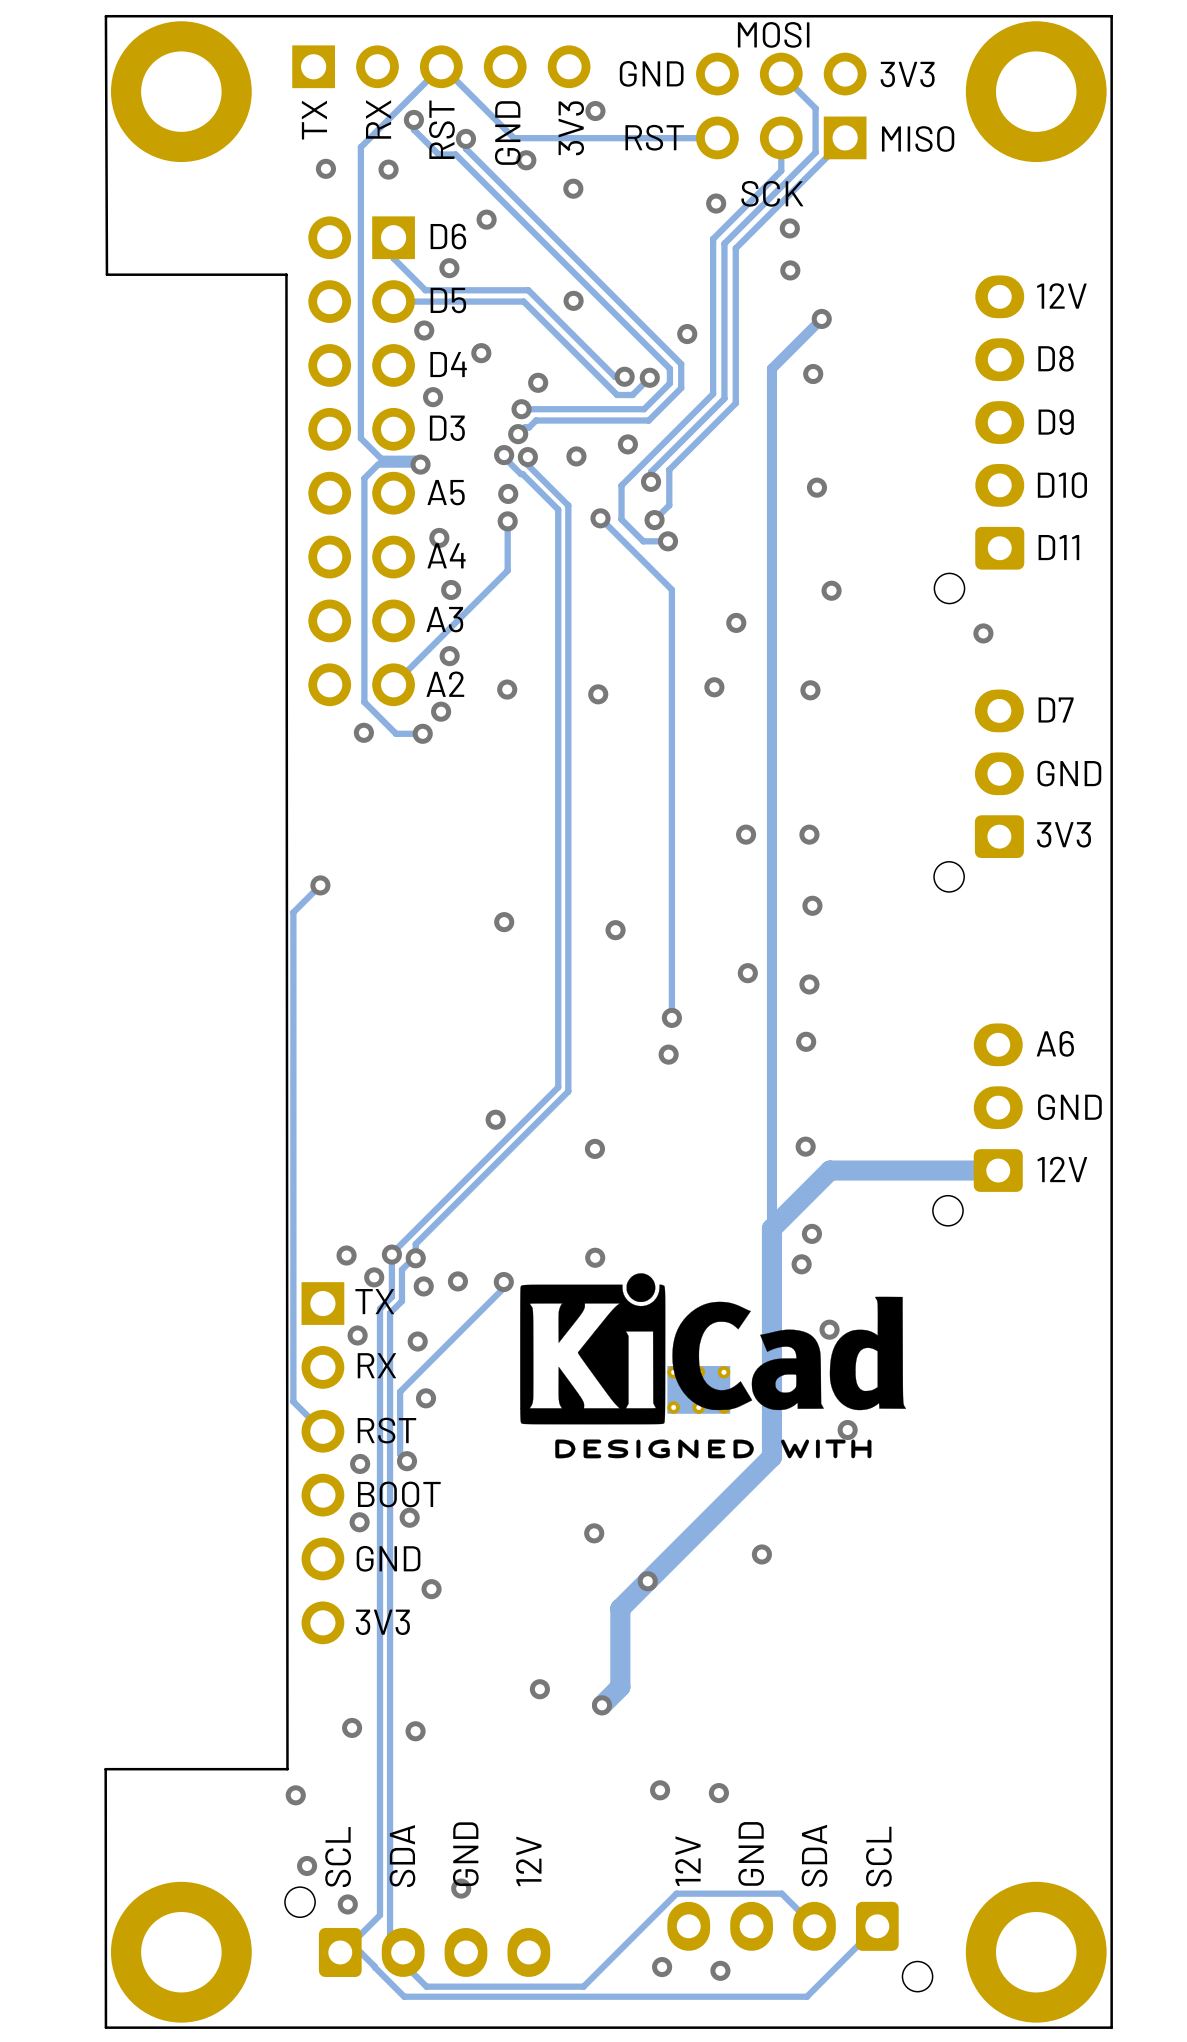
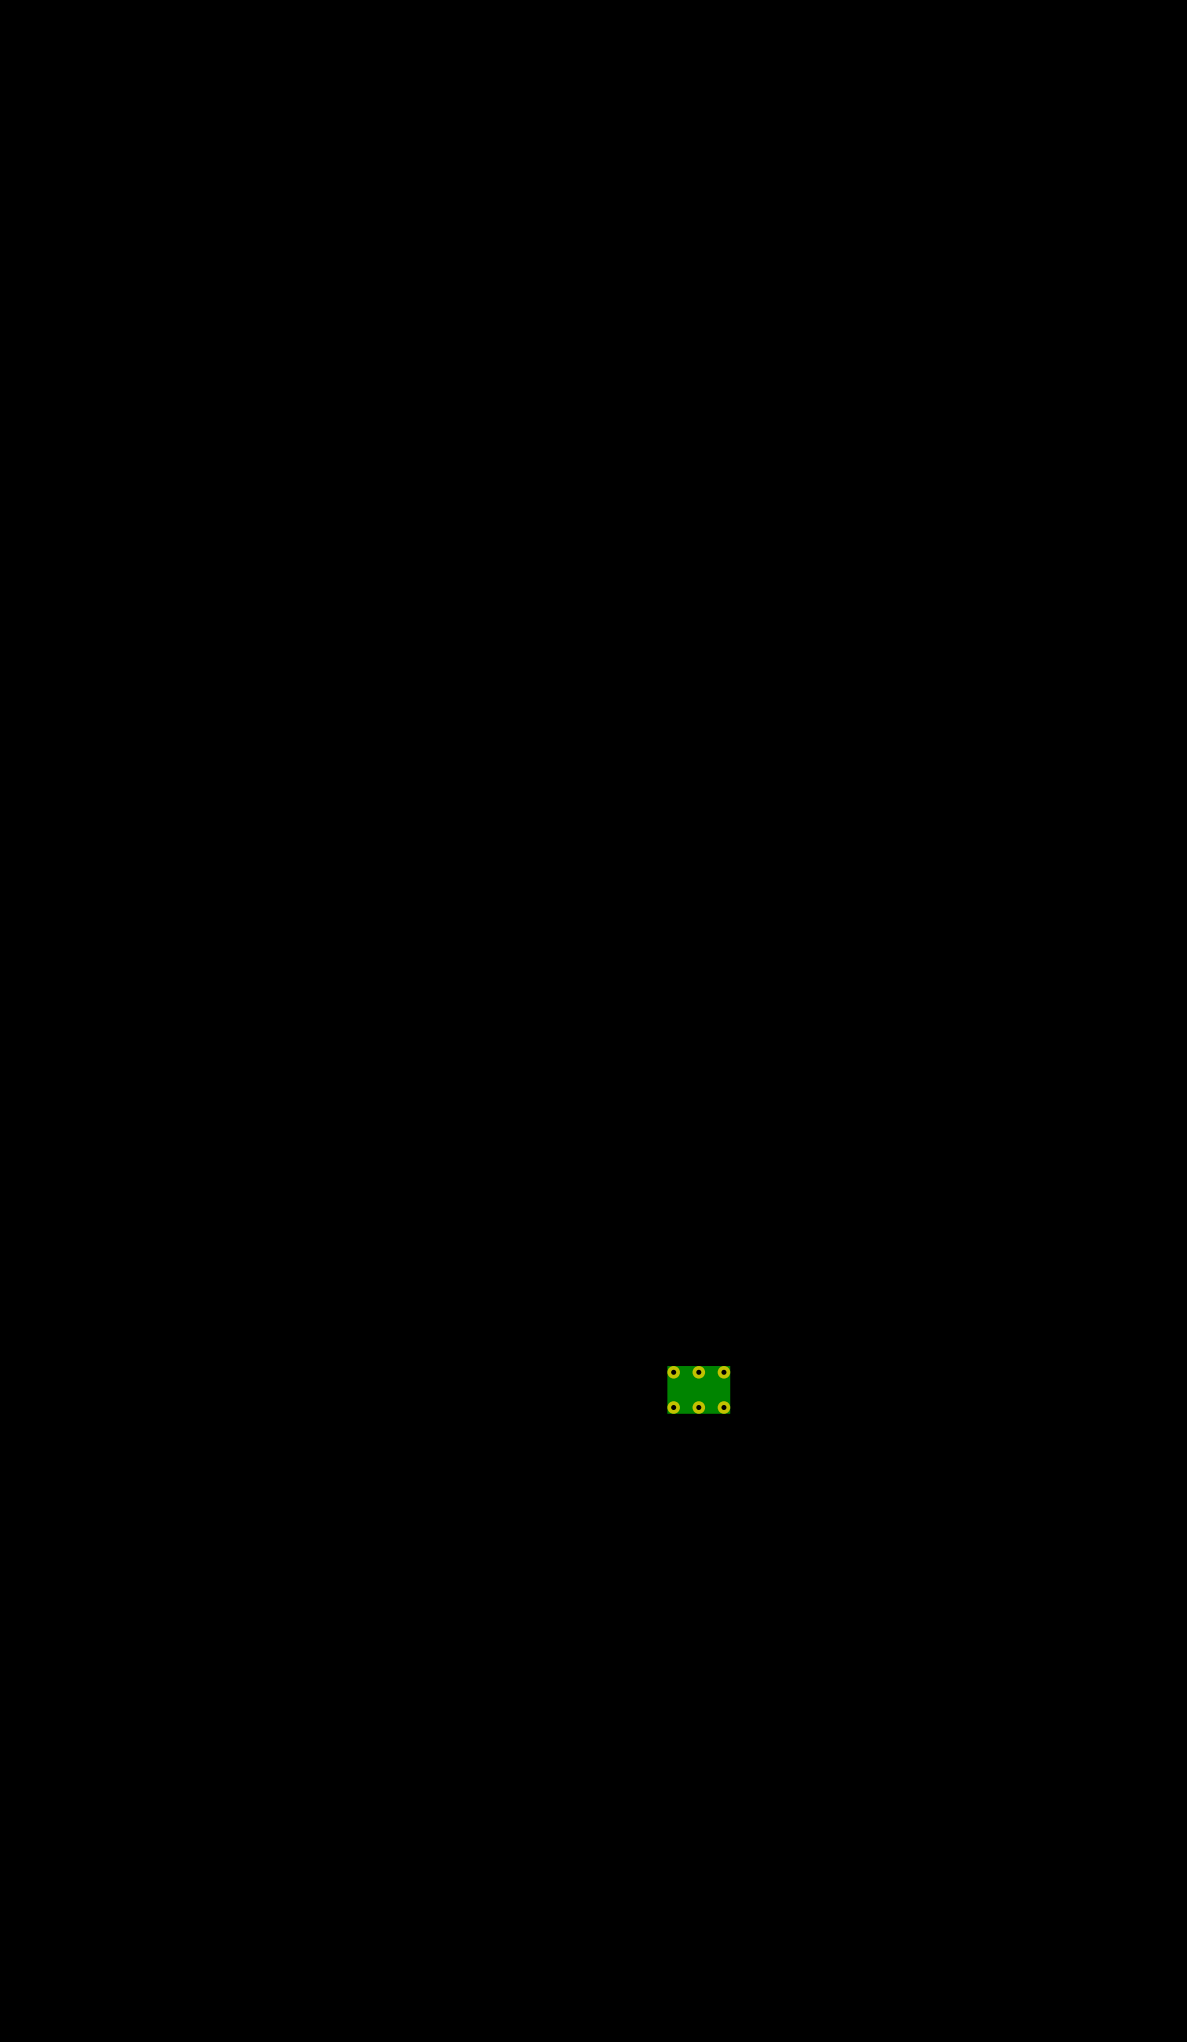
board edge: (1111, 16) (105, 16) (106, 274) (286, 274) (287, 1769) (105, 1769) (105, 2027) (1111, 2027) (1111, 16) -> none
text: MOSI (773, 34) -> none
part: (441, 66) -> none
text: GND (651, 73) -> none
track: (781, 74) (815, 108) (815, 152) (724, 243) (724, 398) (651, 472) (651, 481) -> none
text: 3V3 (907, 74) -> none
part: (181, 91) -> none
part: (1036, 91) -> none
part: (781, 105) -> none
via: (595, 111) -> none
text: RX (378, 119) -> none
track: (413, 119) (413, 129) (438, 154) (455, 154) (669, 368) (669, 383) (644, 409) (521, 409) -> none
via: (413, 119) -> none
text: TX (314, 120) -> none
text: 3V3 (571, 128) -> none
text: RST (441, 129) -> none
text: GND (507, 133) -> none
text: RST (654, 137) -> none
track: (781, 137) (781, 170) (713, 238) (713, 393) (621, 485) (621, 519) (643, 541) (668, 541) -> none
track: (845, 137) (735, 248) (735, 403) (669, 469) (669, 505) (654, 520) -> none
track: (465, 138) (465, 148) (681, 364) (681, 388) (648, 420) (536, 420) (518, 434) -> none
via: (465, 138) -> none
track: (717, 138) (514, 138) (441, 66) (360, 147) (360, 438) (381, 458) (414, 458) (420, 464) (378, 464) (364, 478) (364, 702) (396, 733) (422, 733) -> none
text: MISO (918, 138) -> none
via: (526, 160) -> none
via: (325, 168) -> none
via: (388, 169) -> none
via: (573, 188) -> none
text: SCK (772, 193) -> none
via: (716, 203) -> none
via: (486, 219) -> none
via: (789, 228) -> none
text: D6 (448, 236) -> none
track: (393, 237) (393, 258) (425, 290) (528, 290) (614, 376) (624, 376) -> none
via: (449, 268) -> none
via: (790, 270) -> none
text: 12V (1061, 295) -> none
text: D5 (448, 300) -> none
via: (573, 300) -> none
track: (393, 301) (523, 301) (617, 394) (632, 394) (649, 377) -> none
track: (821, 318) (771, 368) (771, 1228) -> none
via: (821, 318) -> none
via: (424, 330) -> none
via: (687, 334) -> none
via: (481, 353) -> none
text: D8 (1056, 358) -> none
text: D4 (448, 364) -> none
via: (813, 374) -> none
via: (624, 376) -> none
via: (649, 377) -> none
via: (538, 382) -> none
via: (433, 397) -> none
via: (521, 409) -> none
text: D9 (1056, 422) -> none
text: D3 (447, 428) -> none
via: (518, 434) -> none
part: (979, 439) -> none
via: (627, 444) -> none
track: (504, 455) (504, 457) (558, 509) (558, 1087) (391, 1253) (391, 1296) (379, 1308) (379, 1915) (342, 1952) -> none
via: (504, 455) -> none
via: (576, 456) -> none
track: (527, 457) (527, 465) (568, 505) (568, 1091) (415, 1244) (415, 1258) (401, 1269) (401, 1301) (390, 1313) (390, 1939) (403, 1952) (403, 1963) (426, 1986) (583, 1986) (676, 1893) (781, 1893) (814, 1926) -> none
via: (527, 457) -> none
part: (361, 461) -> none
via: (420, 464) -> none
via: (651, 481) -> none
text: D10 (1062, 485) -> none
via: (816, 487) -> none
text: A5 (446, 492) -> none
via: (508, 493) -> none
track: (600, 518) (671, 589) (671, 1017) -> none
via: (600, 518) -> none
via: (654, 520) -> none
track: (507, 521) (507, 570) (393, 684) -> none
via: (507, 521) -> none
via: (439, 537) -> none
via: (668, 541) -> none
text: D11 (1058, 547) -> none
text: A4 (446, 555) -> none
via: (451, 589) -> none
via: (831, 590) -> none
text: A3 (444, 619) -> none
via: (736, 622) -> none
via: (983, 633) -> none
via: (449, 656) -> none
text: A2 (445, 684) -> none
via: (714, 687) -> none
via: (507, 689) -> none
via: (810, 690) -> none
via: (598, 694) -> none
text: D7 (1056, 709) -> none
via: (441, 711) -> none
via: (363, 732) -> none
via: (422, 733) -> none
text: GND (1069, 773) -> none
part: (978, 790) -> none
via: (746, 834) -> none
via: (809, 834) -> none
text: 3V3 (1064, 834) -> none
track: (320, 885) (293, 912) (293, 1401) (322, 1431) -> none
via: (320, 885) -> none
via: (812, 905) -> none
via: (504, 922) -> none
via: (615, 930) -> none
via: (747, 973) -> none
via: (809, 984) -> none
via: (671, 1017) -> none
via: (806, 1041) -> none
text: A6 (1055, 1043) -> none
via: (668, 1054) -> none
text: GND (1069, 1107) -> none
via: (495, 1119) -> none
part: (977, 1124) -> none
via: (805, 1146) -> none
via: (594, 1148) -> none
text: 12V (1062, 1169) -> none
track: (998, 1170) (830, 1170) (771, 1228) -> none
track: (771, 1228) (771, 1457) (620, 1608) (620, 1686) (602, 1705) -> none
via: (811, 1233) -> none
via: (391, 1254) -> none
via: (346, 1255) -> none
via: (595, 1257) -> none
via: (415, 1258) -> none
via: (801, 1264) -> none
drawing: [520, 1273, 907, 1459] -> none
via: (374, 1277) -> none
via: (457, 1281) -> none
track: (503, 1282) (503, 1288) (400, 1391) (400, 1454) (407, 1461) -> none
via: (503, 1282) -> none
via: (423, 1286) -> none
text: TX (374, 1301) -> none
via: (829, 1329) -> none
via: (357, 1335) -> none
via: (417, 1341) -> none
text: RX (376, 1365) -> none
via: (426, 1398) -> none
text: RST (386, 1430) -> none
via: (847, 1430) -> none
via: (407, 1461) -> none
part: (322, 1463) -> none
via: (360, 1463) -> none
text: BOOT (399, 1494) -> none
via: (409, 1517) -> none
via: (359, 1522) -> none
via: (594, 1533) -> none
via: (761, 1554) -> none
text: GND (388, 1558) -> none
via: (647, 1581) -> none
via: (431, 1589) -> none
text: 3V3 (382, 1622) -> none
via: (539, 1689) -> none
via: (602, 1705) -> none
via: (352, 1727) -> none
via: (415, 1731) -> none
via: (660, 1790) -> none
via: (718, 1793) -> none
via: (295, 1795) -> none
text: GND (751, 1853) -> none
text: GND (465, 1854) -> none
text: SDA (814, 1855) -> none
text: SCL (338, 1856) -> none
text: SDA (402, 1856) -> none
text: SCL (878, 1856) -> none
text: 12V (528, 1861) -> none
text: 12V (687, 1861) -> none
via: (307, 1865) -> none
via: (461, 1888) -> none
via: (347, 1904) -> none
track: (877, 1926) (806, 1996) (404, 1996) (360, 1952) (340, 1952) -> none
part: (417, 1932) -> none
part: (800, 1946) -> none
part: (181, 1952) -> none
part: (1036, 1952) -> none
via: (662, 1967) -> none
via: (720, 1970) -> none

